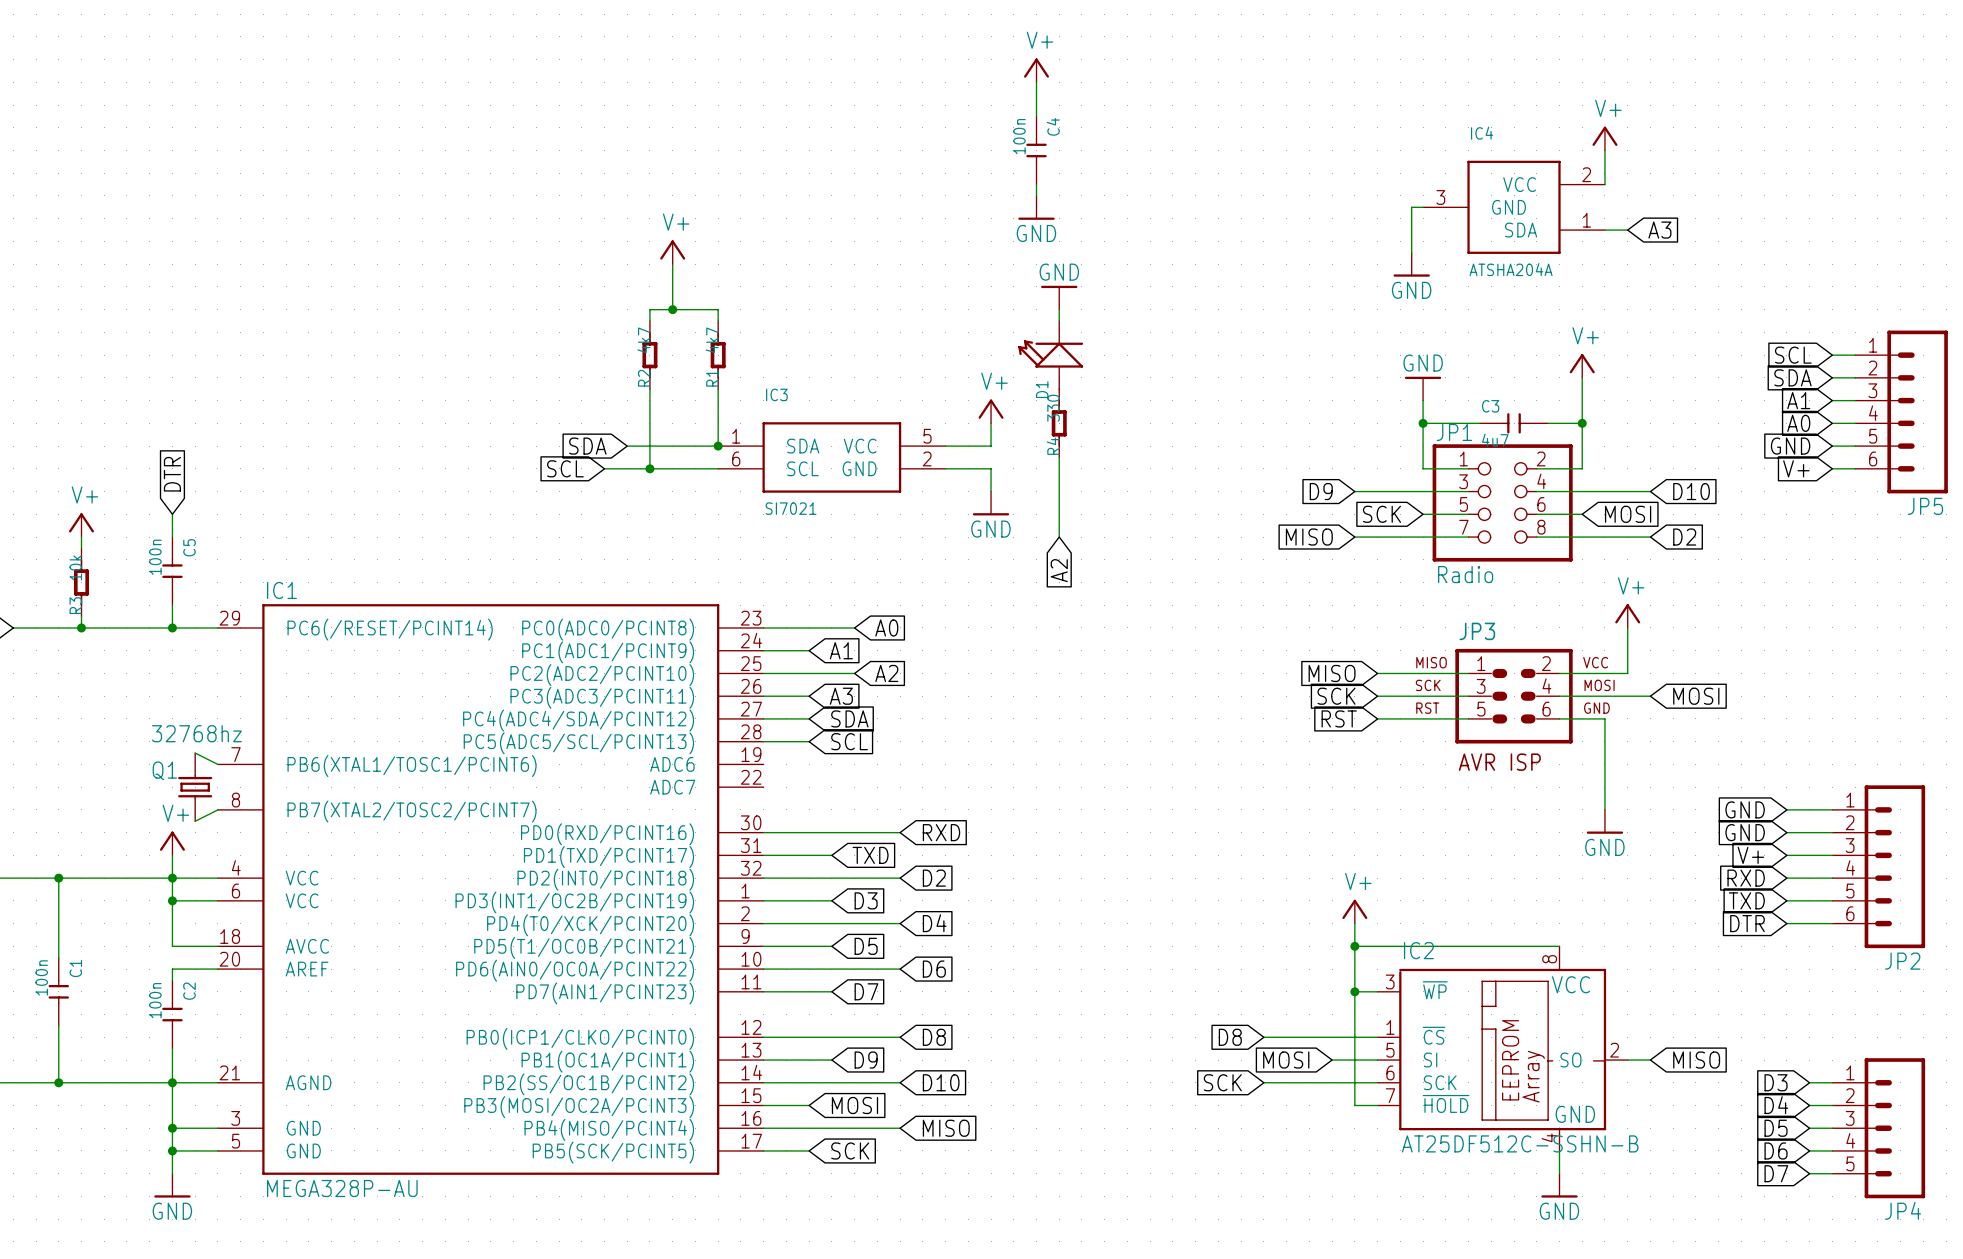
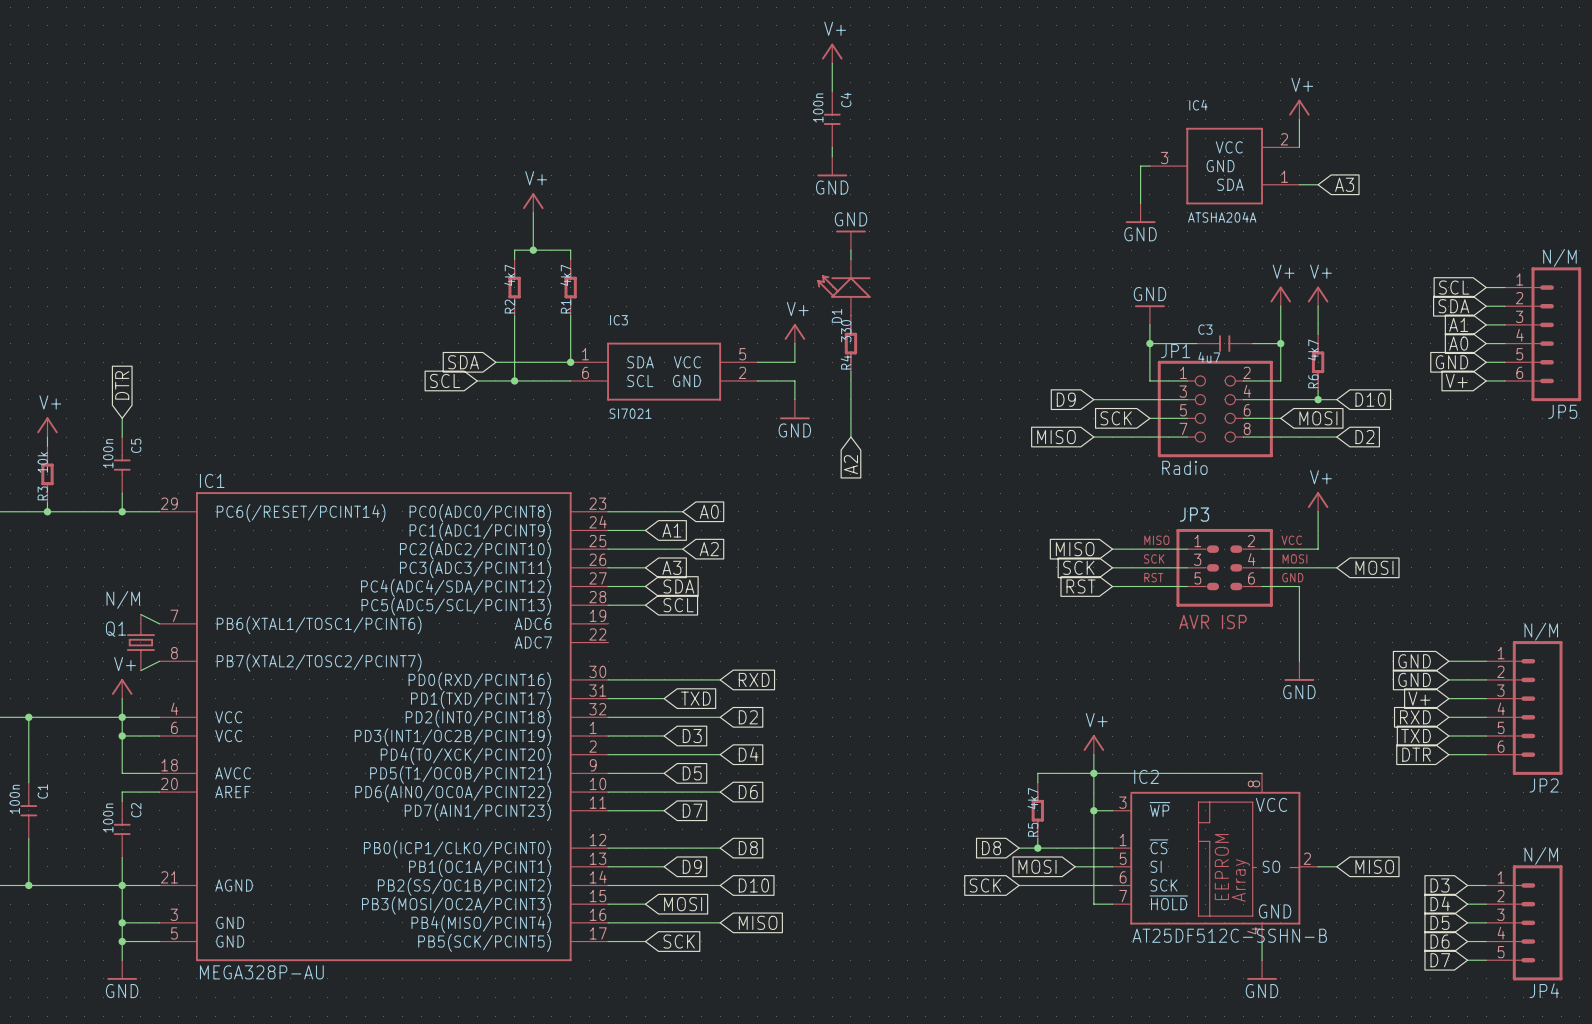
JP5 value: none -> N/M (1559, 257)
power symbol: none -> V+ (1318, 296)
wire: none -> (1318, 306) (1318, 334)
R6: none -> 4k7 (1318, 362)
wire: none -> (1318, 390) (1318, 399)
junction: none -> (1318, 399)
Q1 value: 32768hz (196, 733) -> N/M (123, 599)
JP2 value: none -> N/M (1541, 631)
wire: none -> (1093, 773) (1037, 773) (1037, 782)
R5: none -> 4k7 (1037, 810)
wire: none -> (1037, 838) (1037, 848)
junction: none -> (1037, 848)
JP4 value: none -> N/M (1541, 855)

